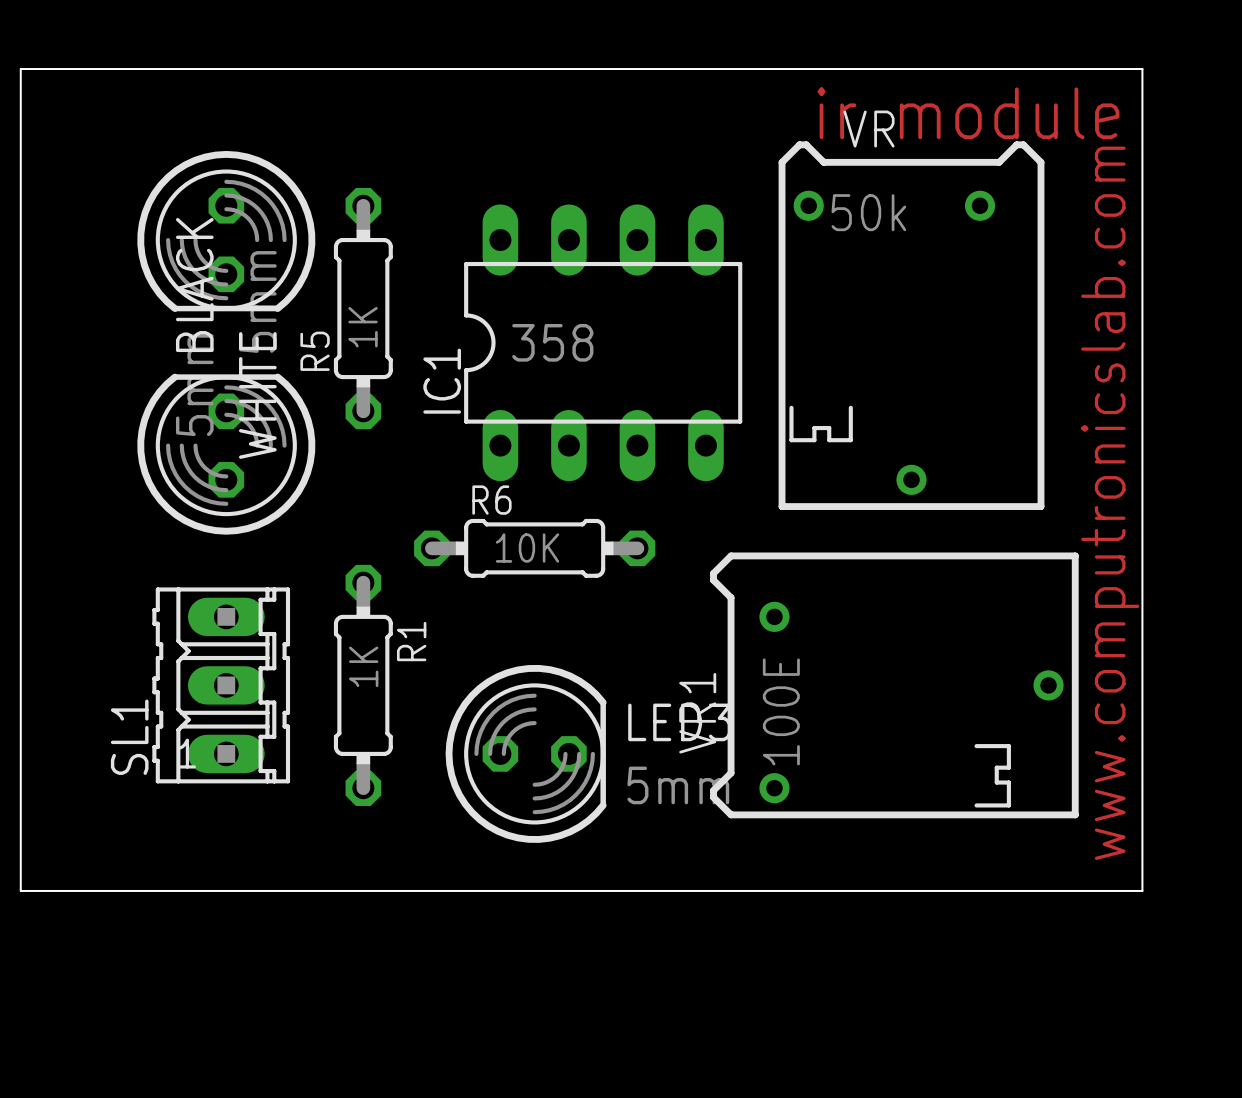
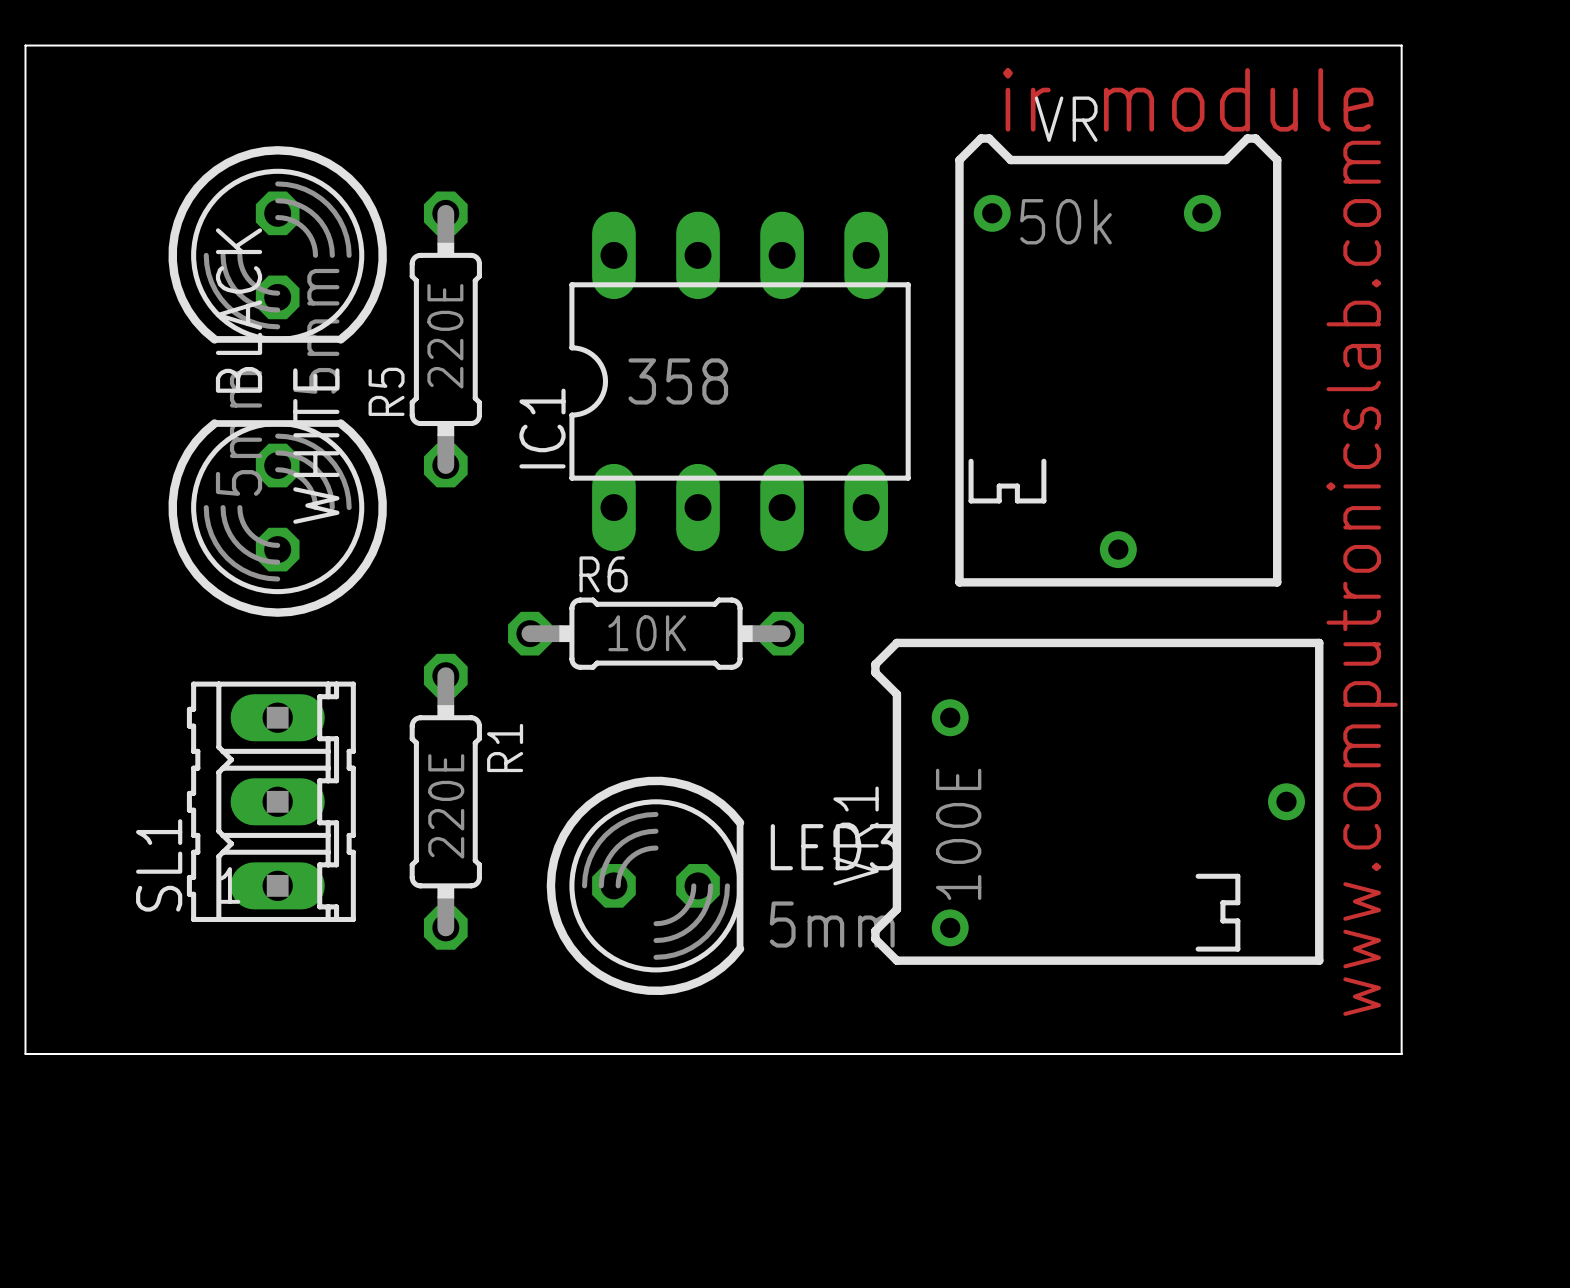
R5 value: 1K (363, 327) -> 220E (445, 336)
R1 value: 1K (363, 666) -> 220E (446, 806)

